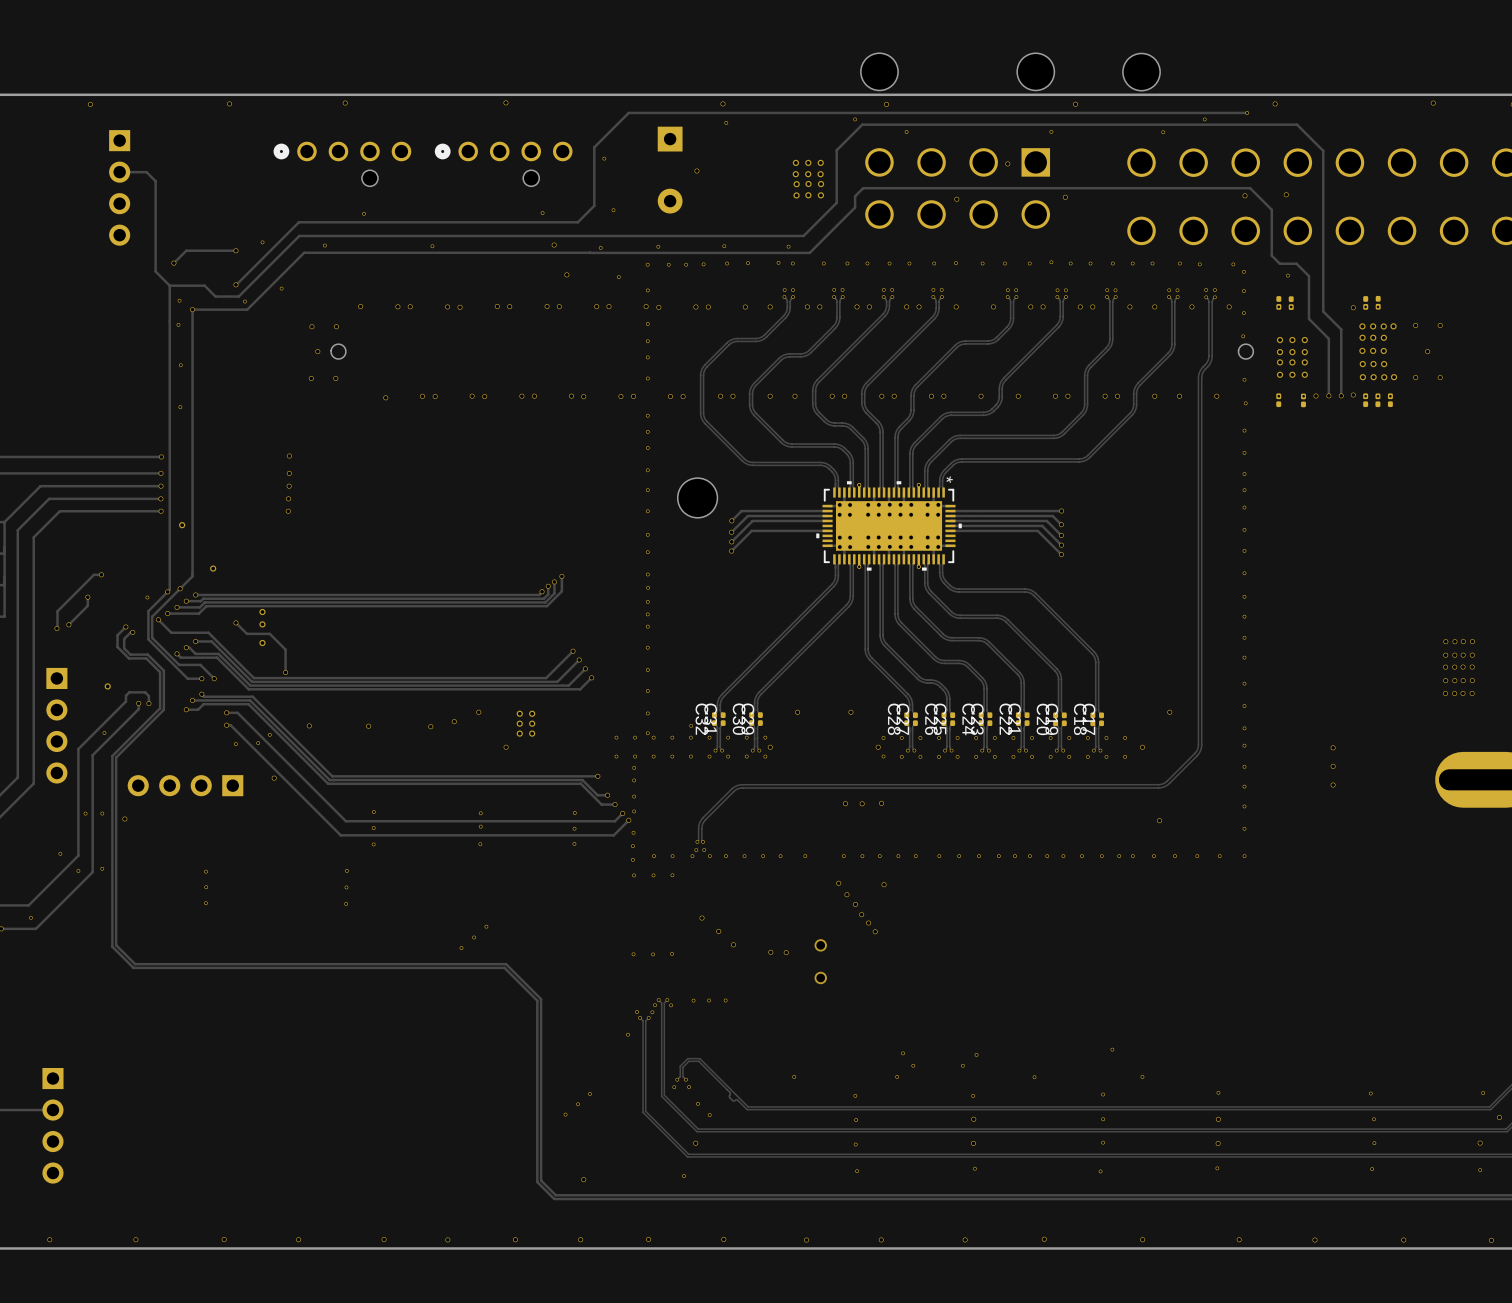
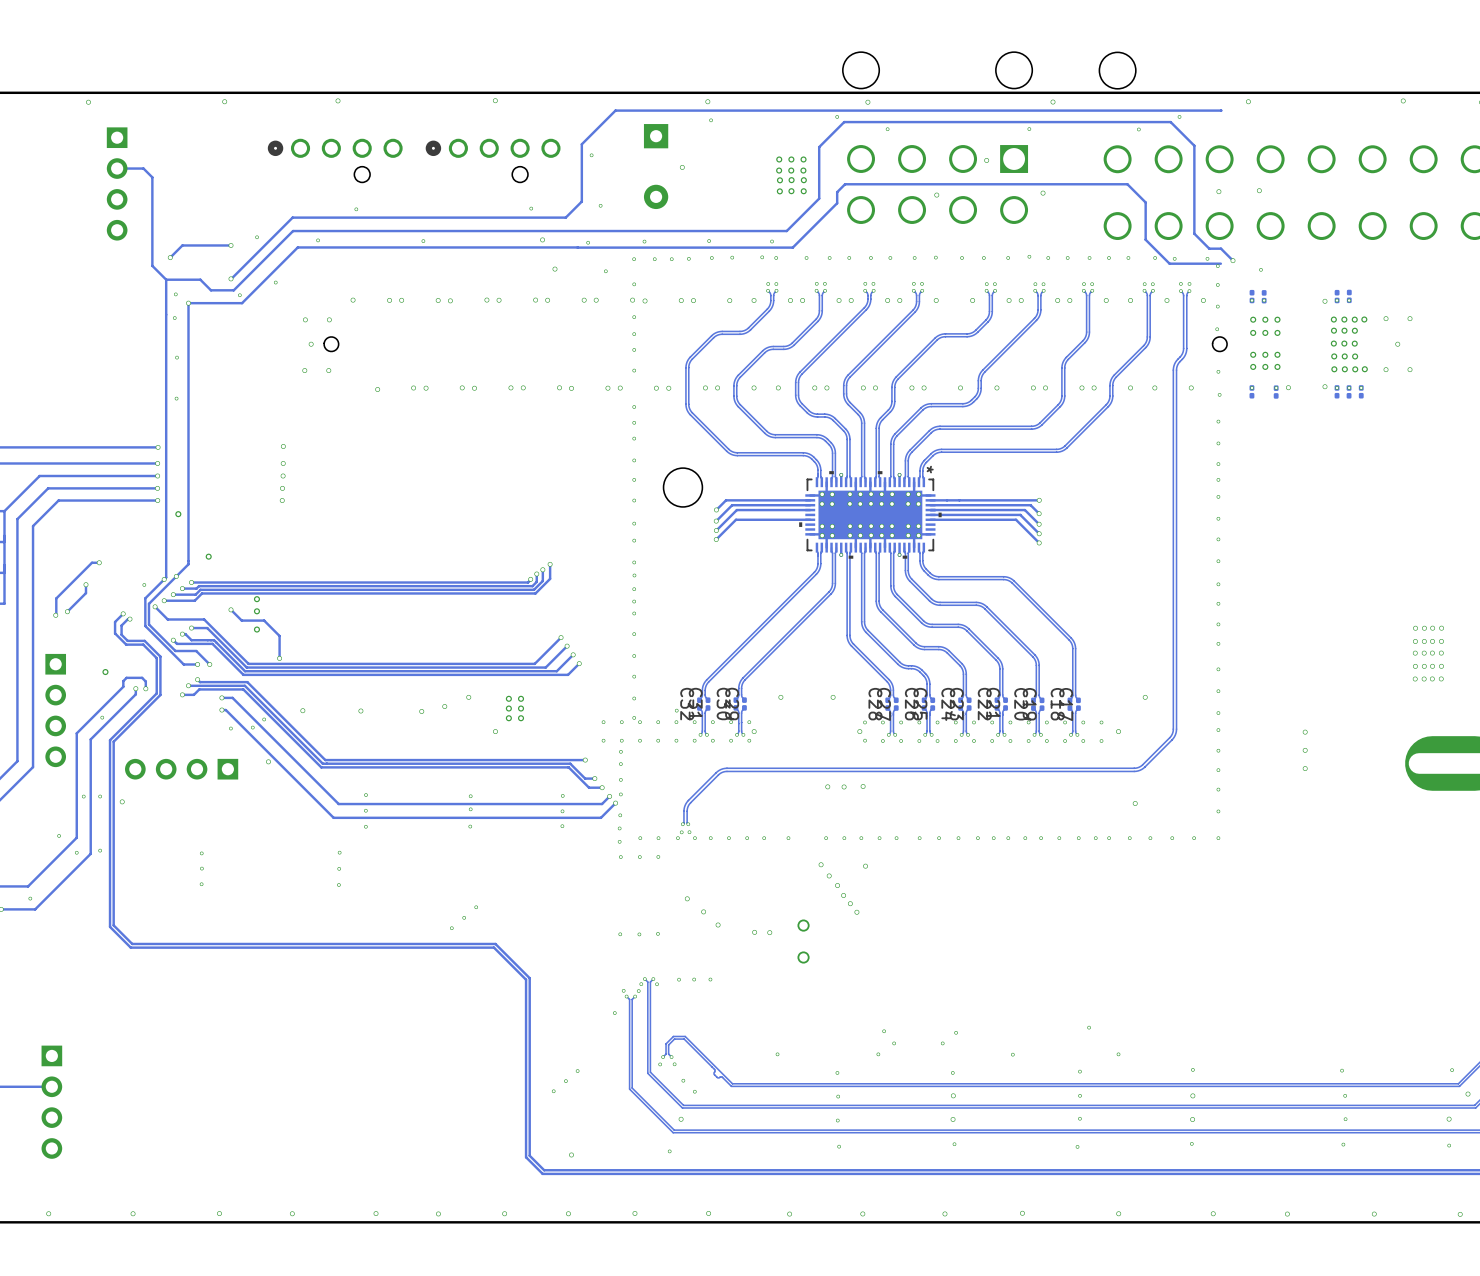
via: (1247, 112) -> none
track: (1195, 124) (1297, 124) (1323, 150) (1323, 311) (1341, 329) (1341, 395) -> (1170, 122) (1194, 145) (1194, 233) (1209, 248) (1221, 248) (1232, 260)
track: (1151, 188) (1250, 188) (1271, 209) (1271, 255) (1279, 263) (1296, 263) (1309, 276) (1309, 318) (1328, 338) (1328, 395) -> (1127, 184) (1145, 202) (1145, 239) (1169, 263) (1220, 263)
via: none -> (1232, 260)
via: none -> (1253, 319)
via: none -> (1265, 319)
via: none -> (1277, 319)
via: (1280, 352) -> none
via: (1292, 352) -> none
via: (1304, 352) -> none
via: (1328, 395) -> none
via: (1341, 395) -> none

